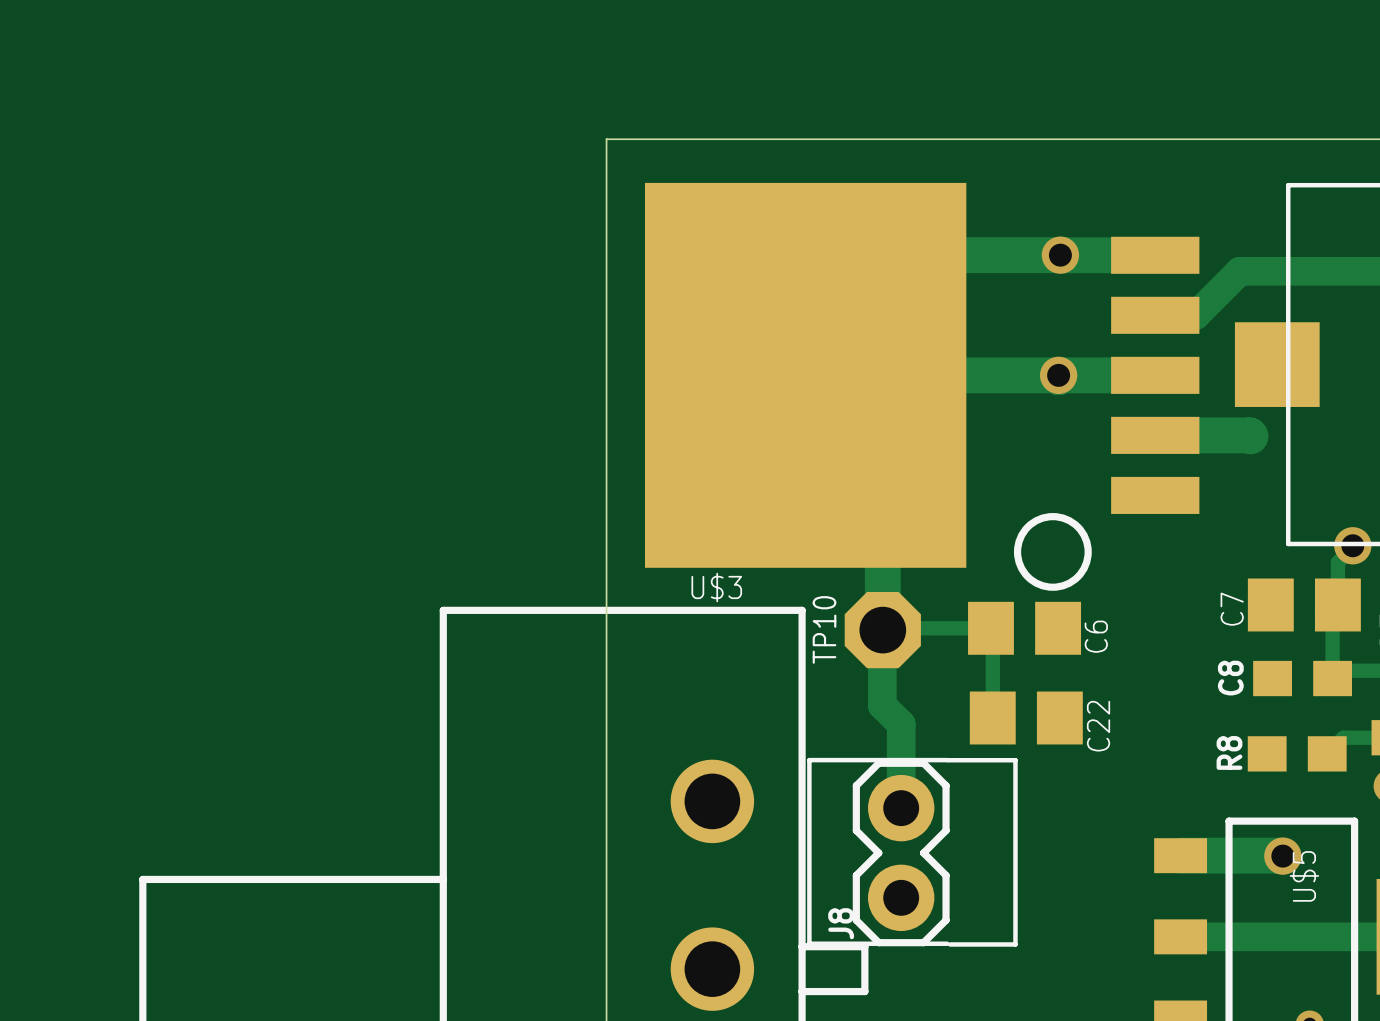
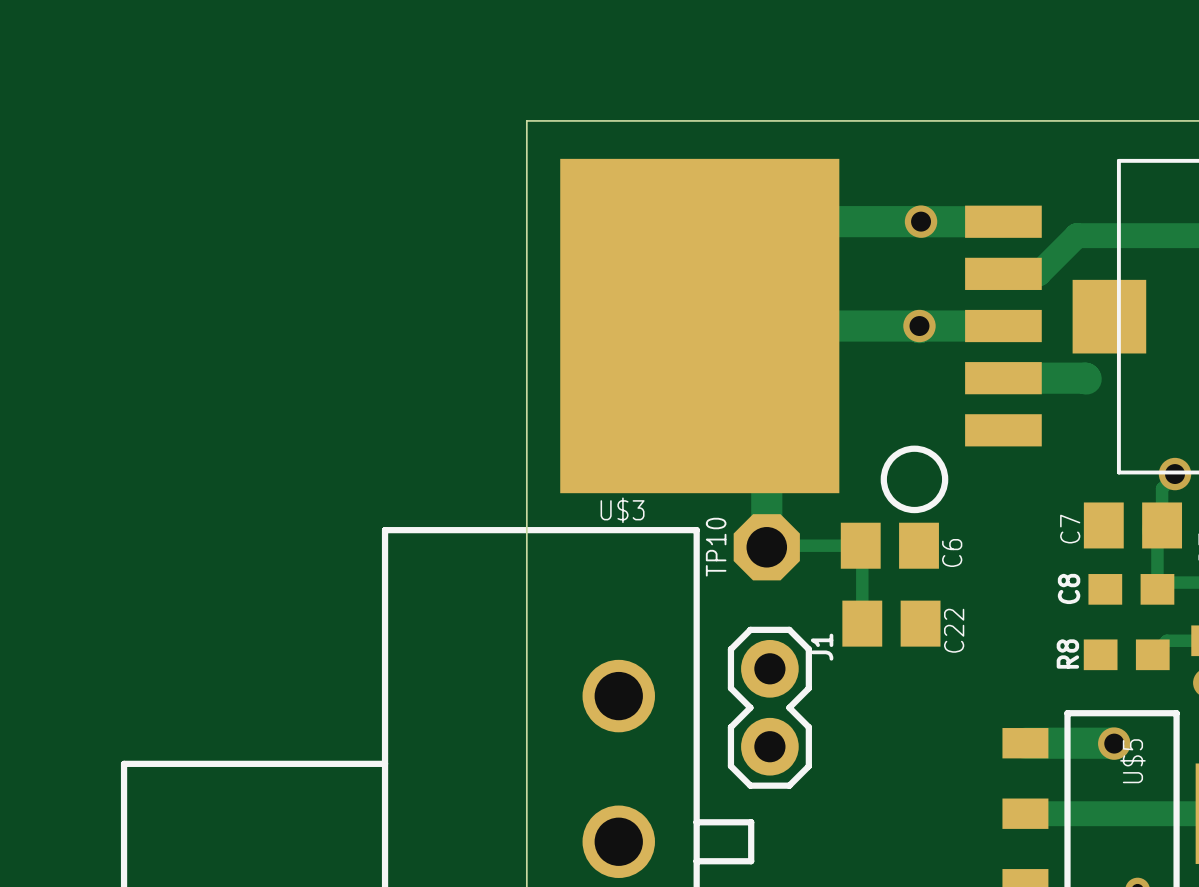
track: (882, 630) (882, 705) (901, 724) (901, 808) -> none
J1: none -> (769, 707)
J8: (912, 852) -> none

